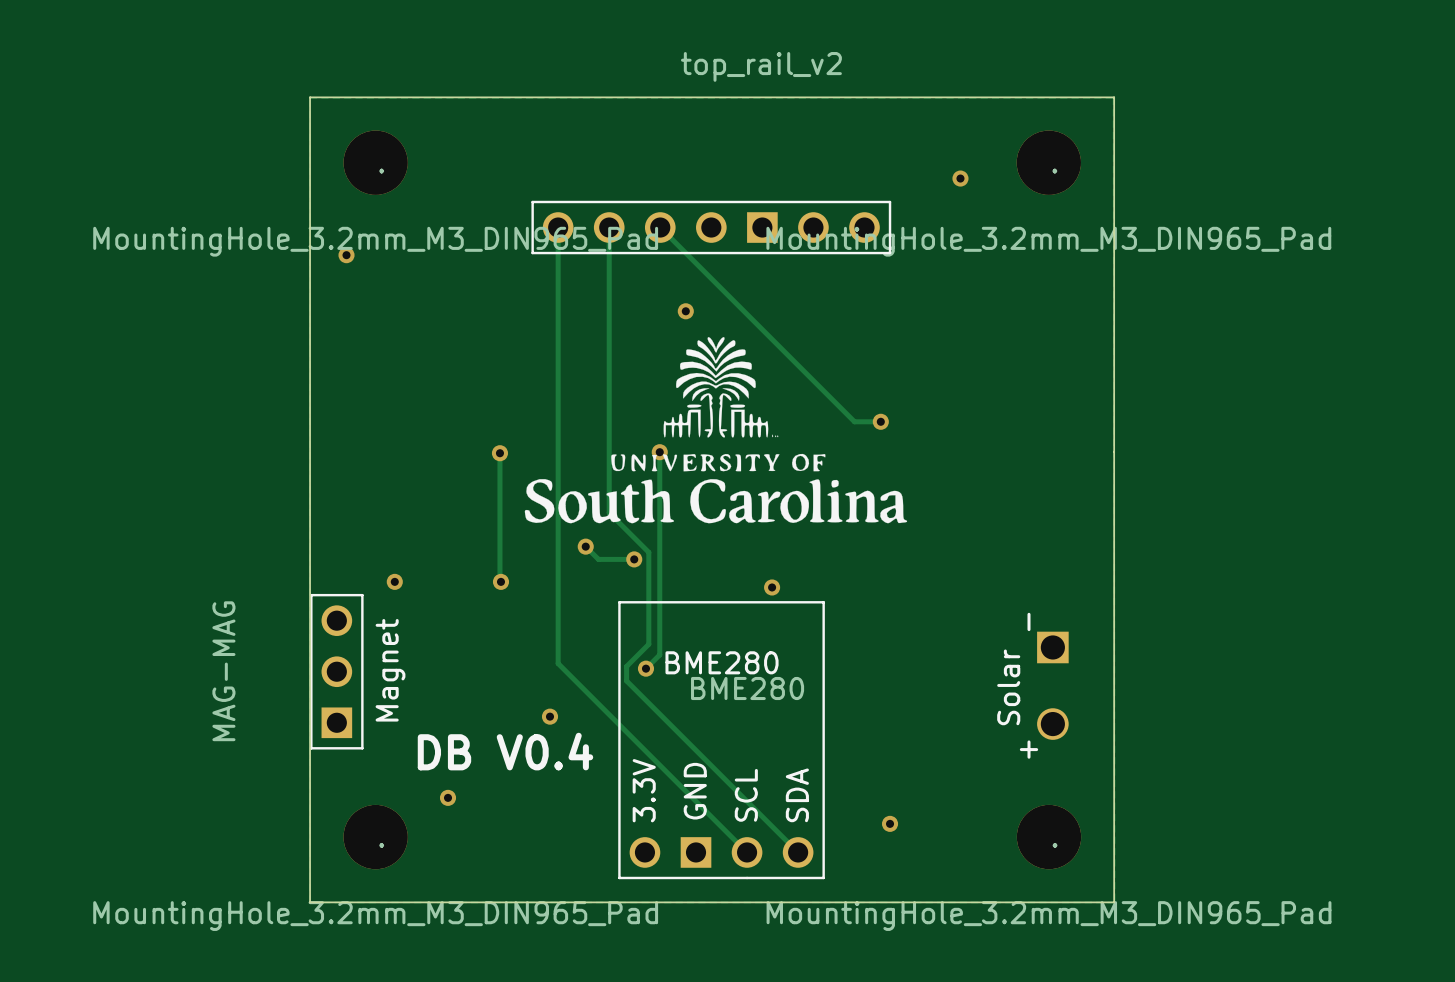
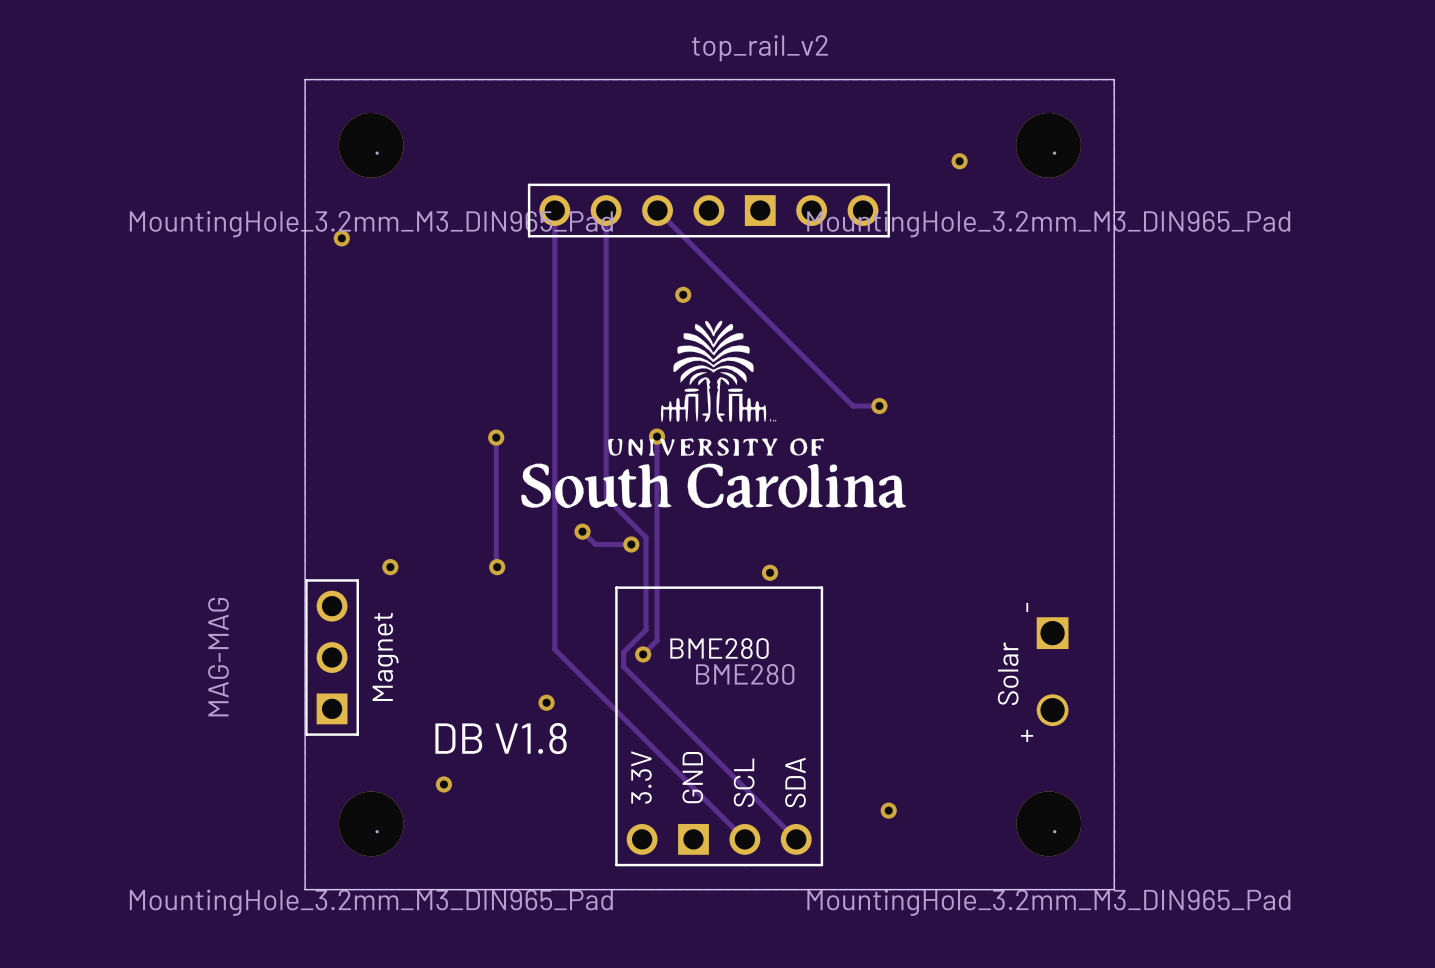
text: DB V0.4 (505, 751) -> DB V1.8 (501, 738)

